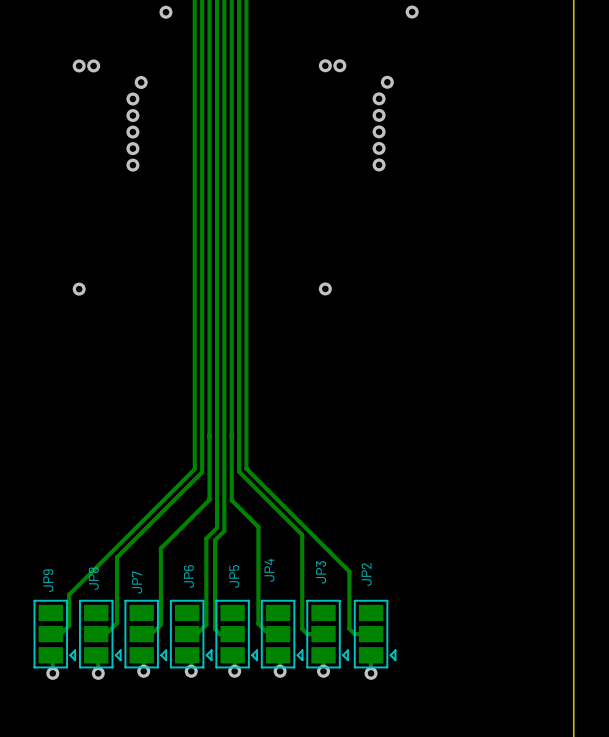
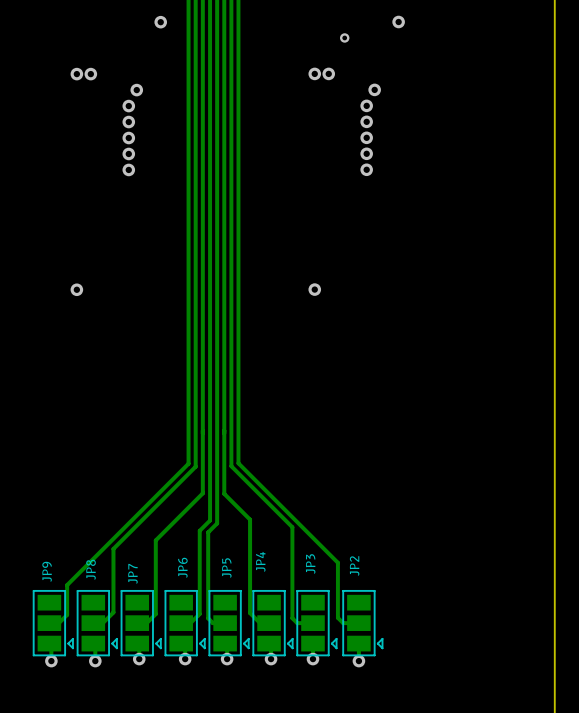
via: none -> (344, 37)

